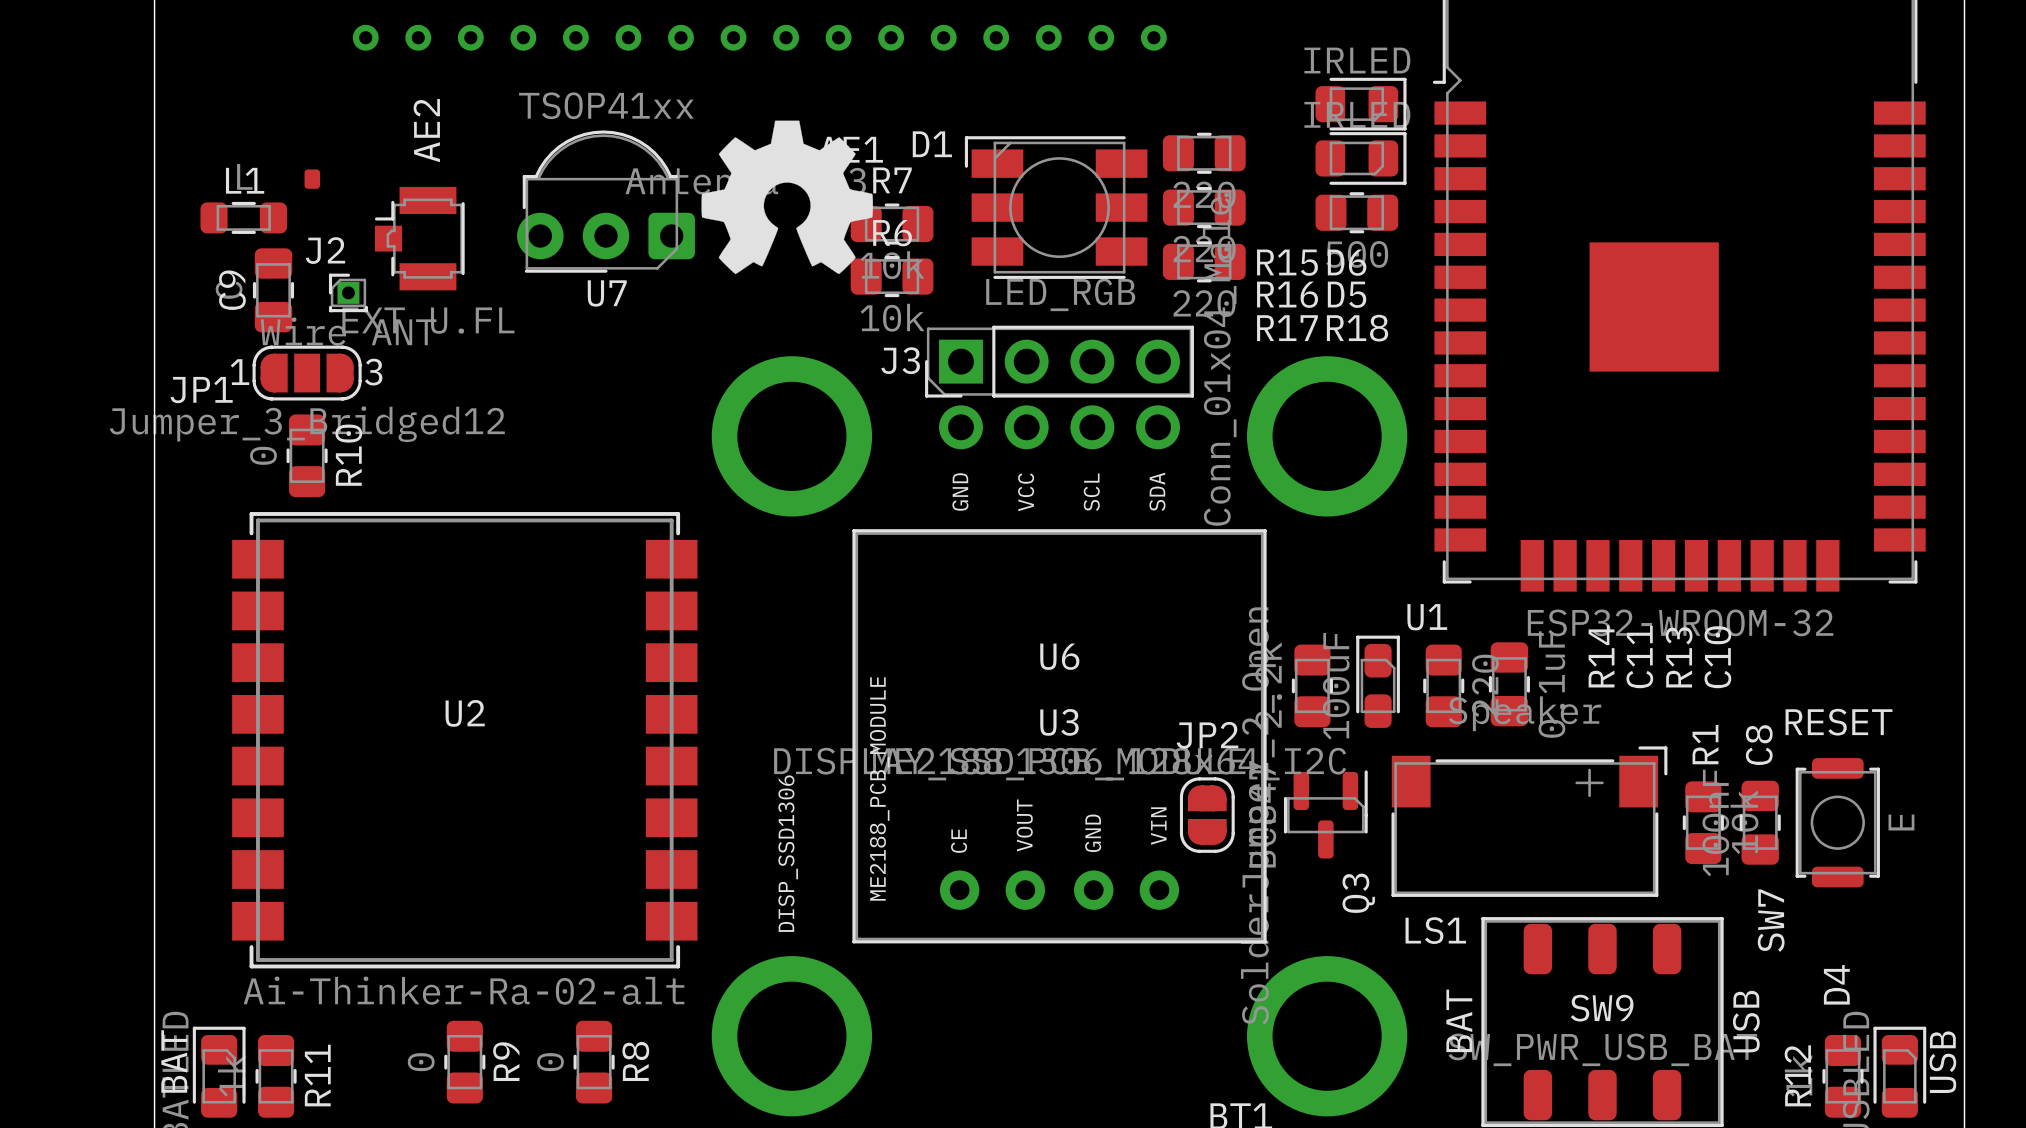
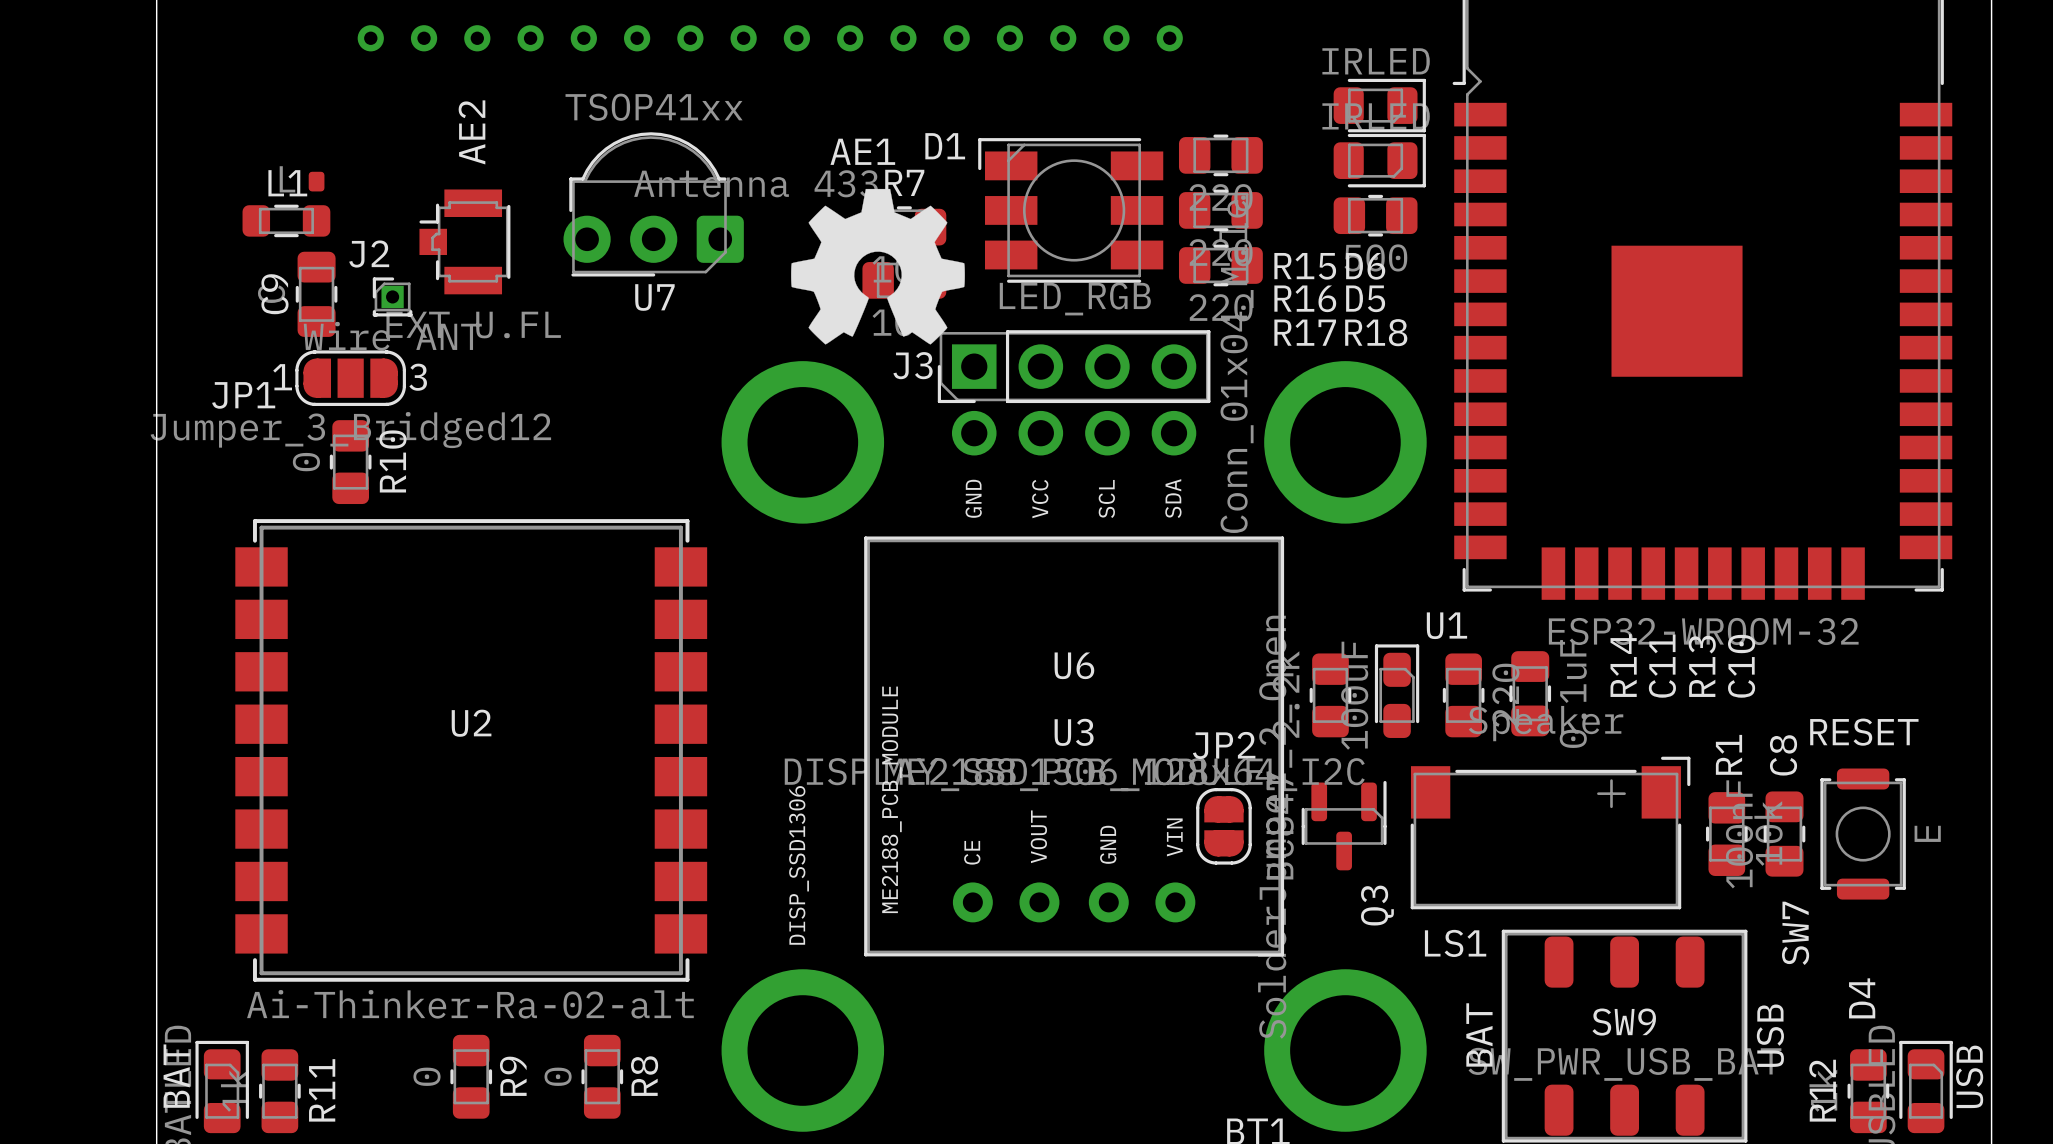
drawing position: (787, 197) -> (877, 266)
U7 position: (606, 201) -> (653, 204)
L1 position: (243, 217) -> (286, 220)
AE2 position: (419, 238) -> (464, 241)
C9 position: (273, 290) -> (316, 294)
J2 position: (348, 292) -> (392, 296)
JP1 position: (307, 373) -> (350, 378)
R10 position: (307, 455) -> (350, 462)

